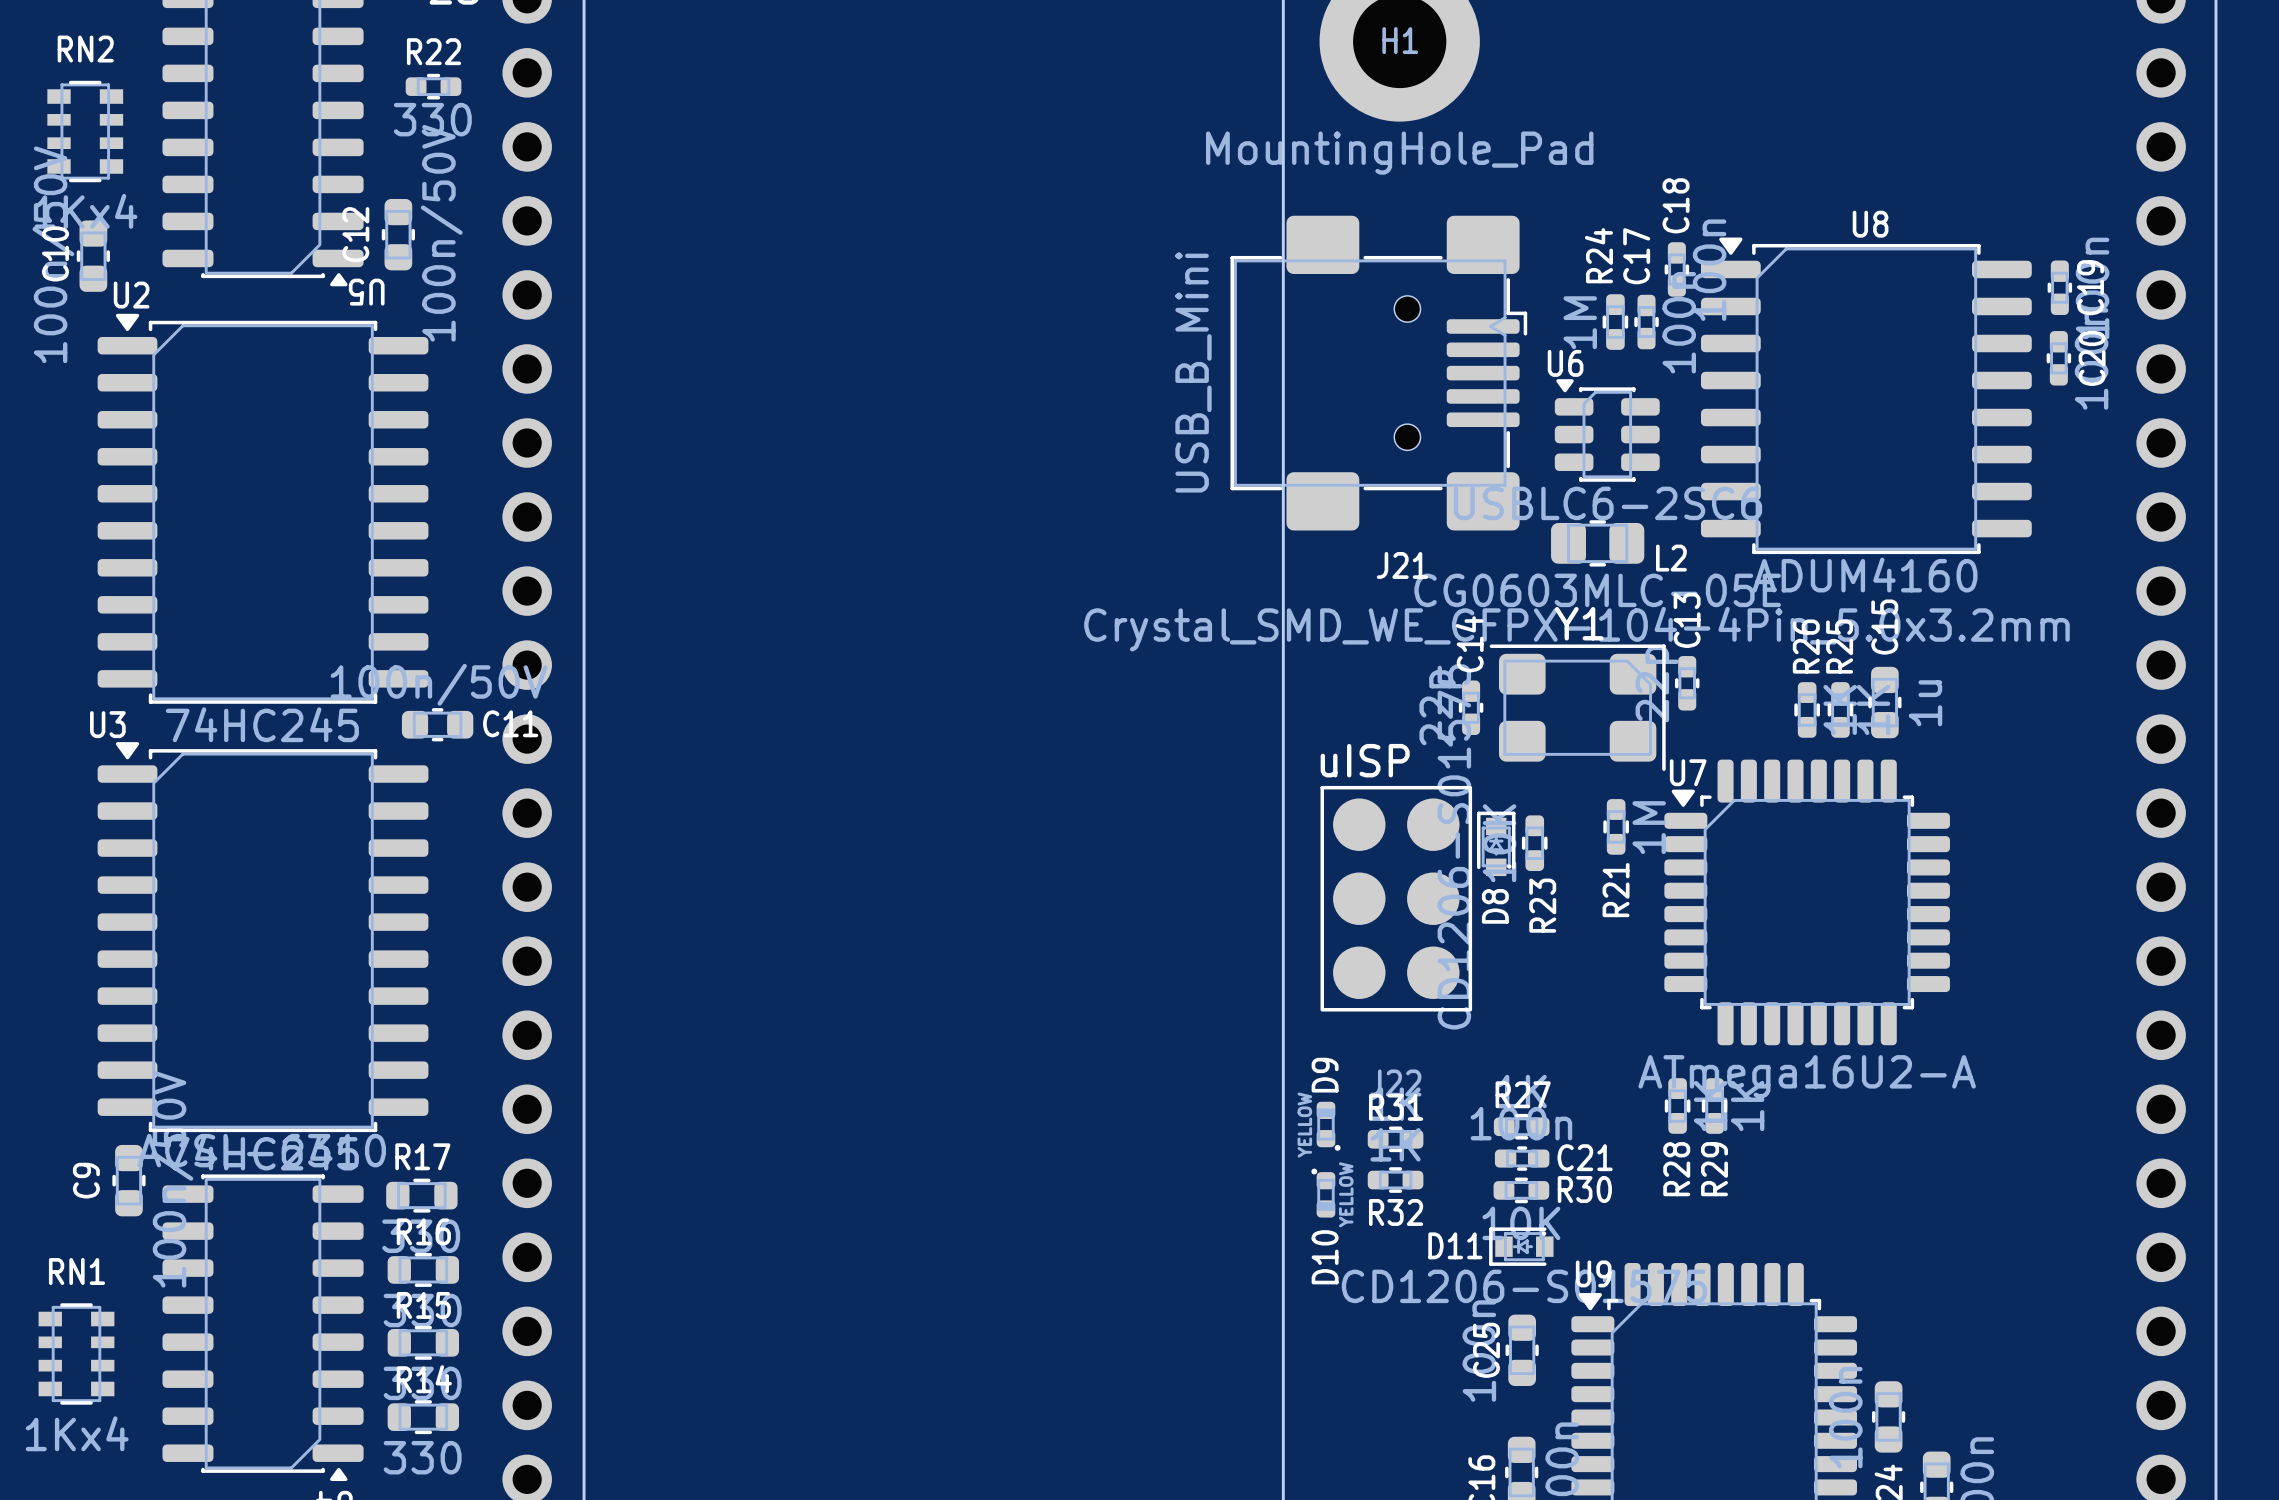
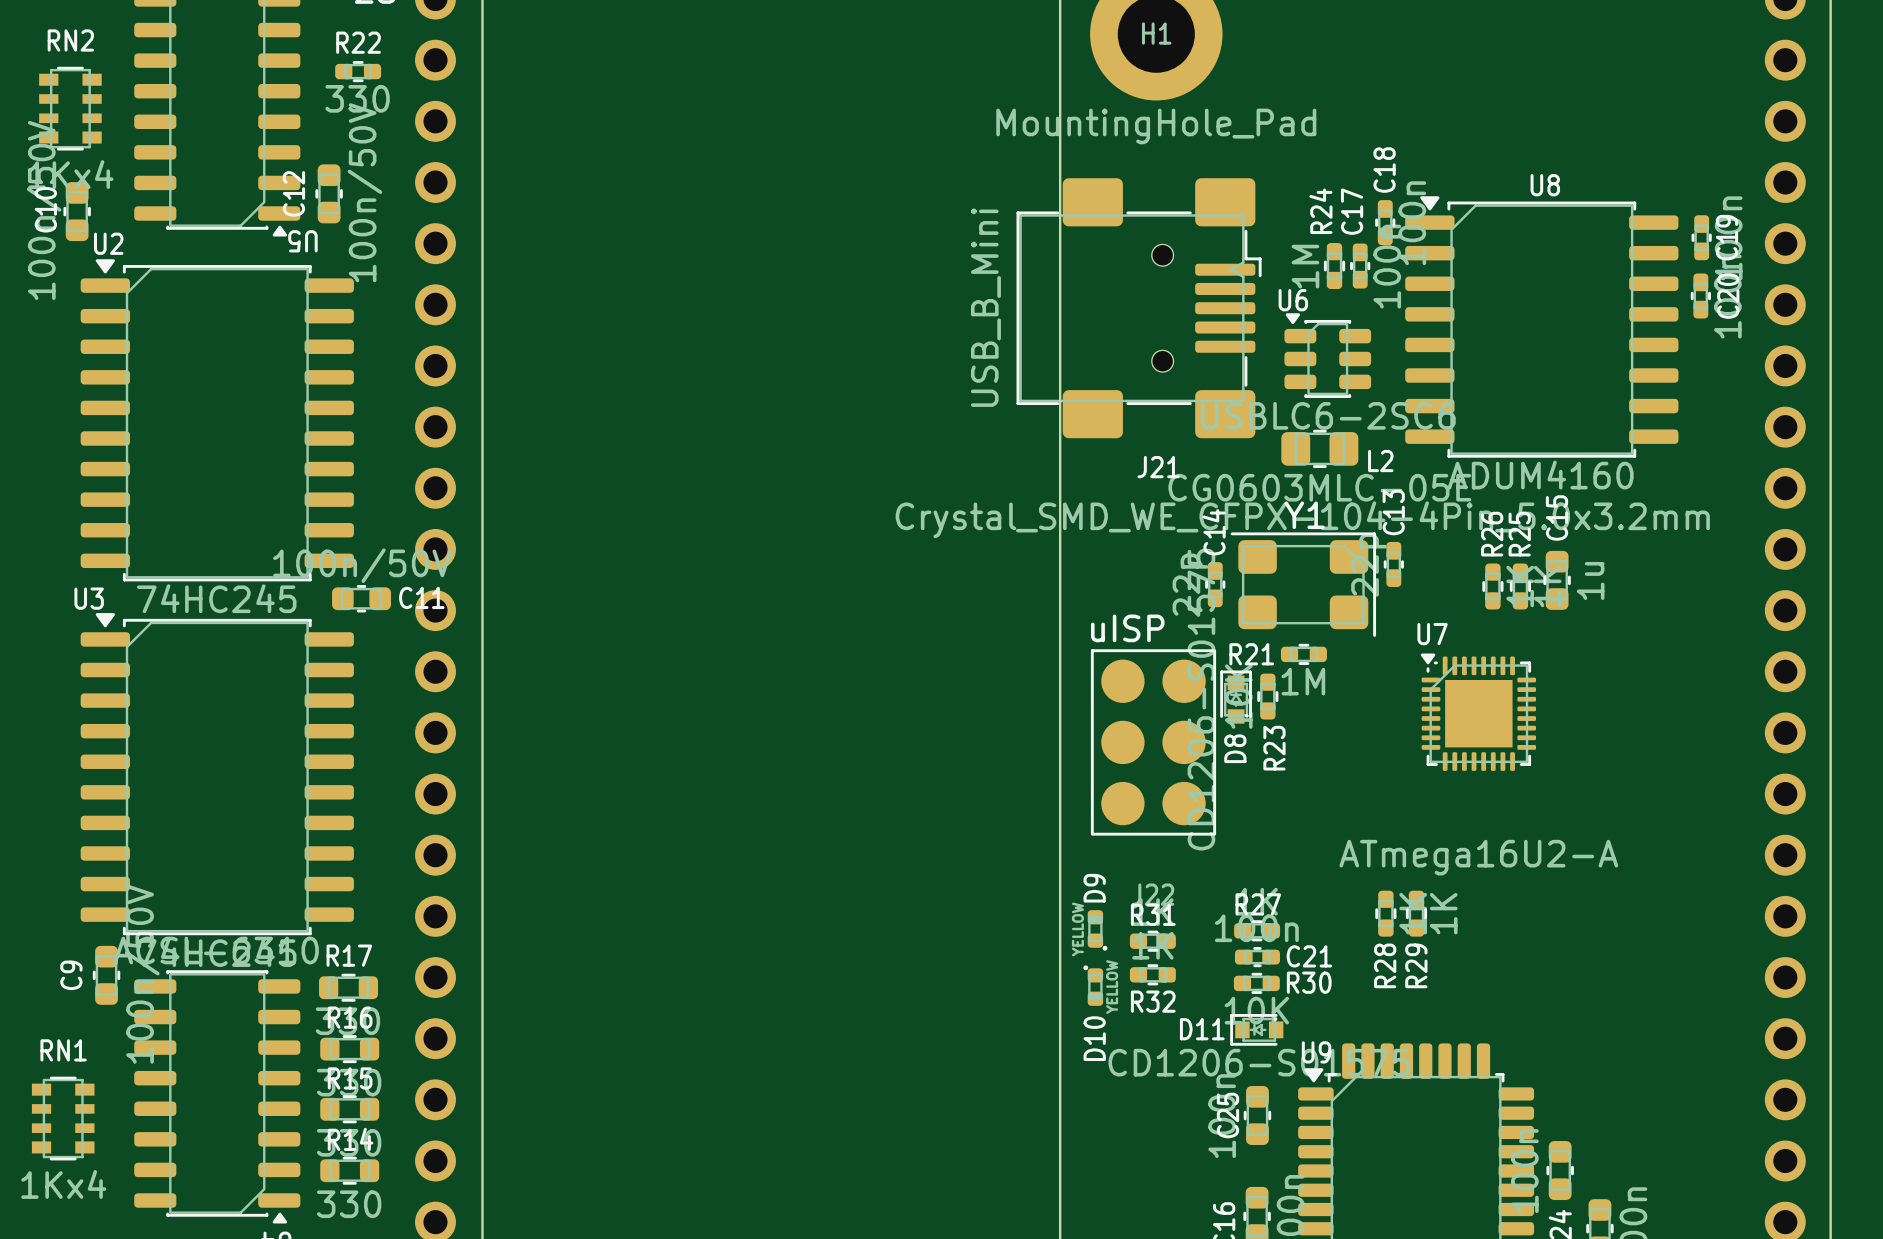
U7 footprint: [1664, 759, 1950, 1046] -> [1420, 653, 1537, 771]
U7 name position: U7 (1688, 772) -> U7 (1432, 634)
R21 rotation: 0° (1616, 826) -> 90° clockwise (1303, 654)
R21 position: (1616, 826) -> (1303, 654)

